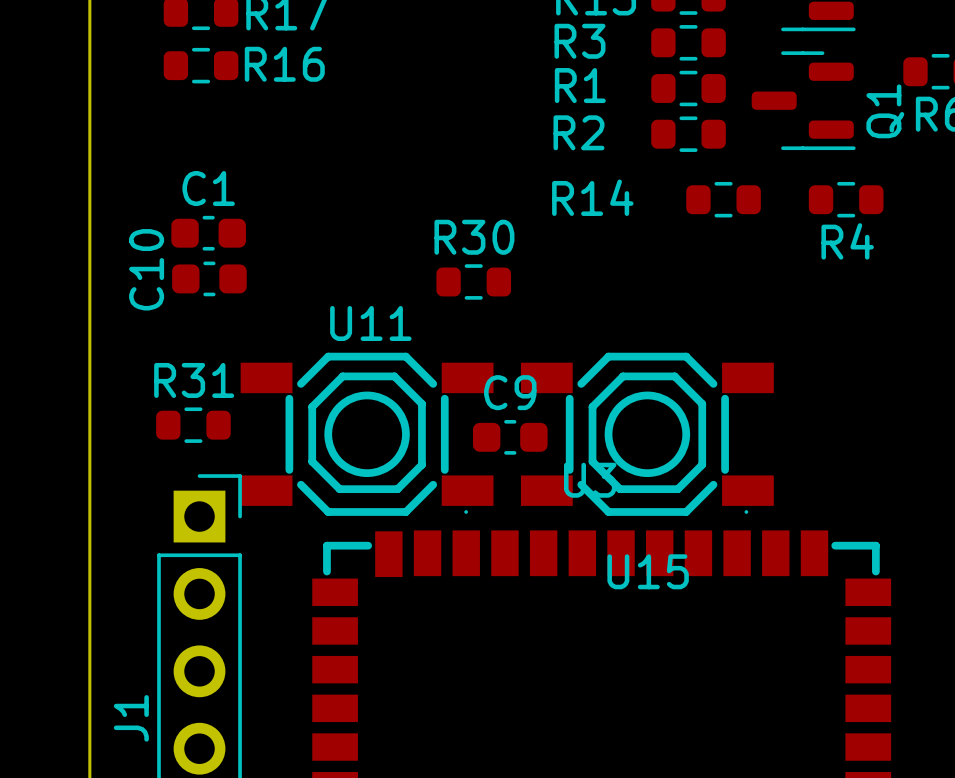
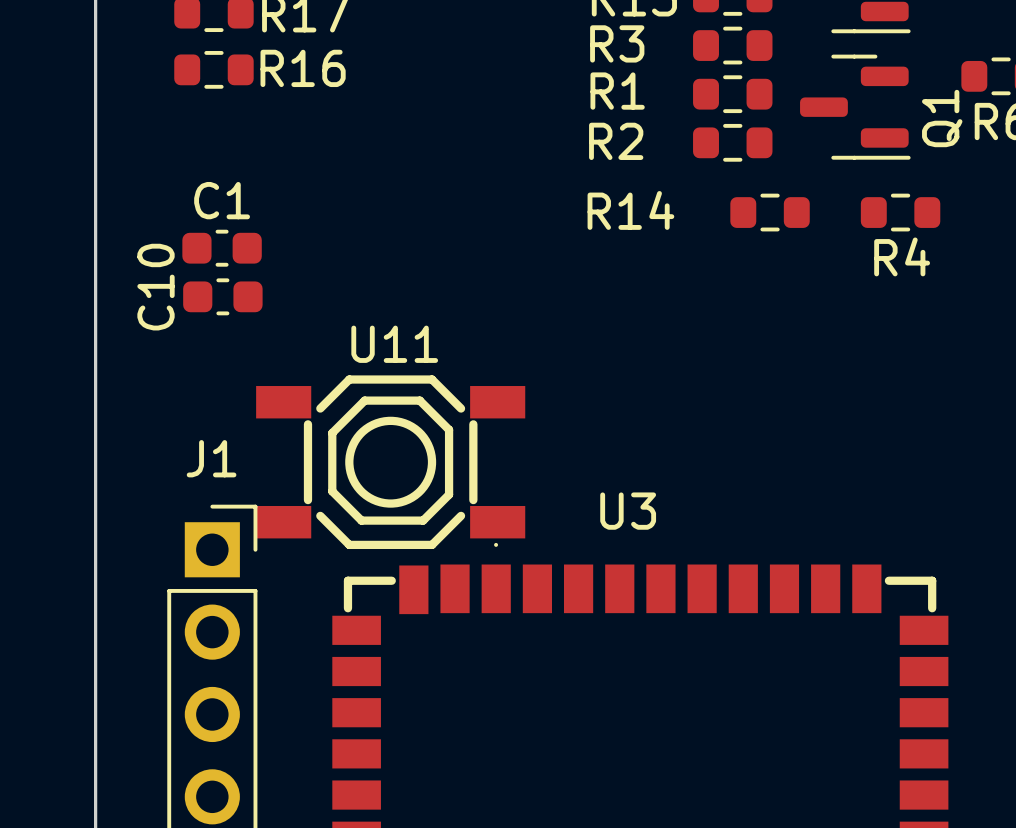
R30: (473, 281) -> none
R31: (193, 425) -> none
U15: (647, 434) -> none
C9: (510, 437) -> none
J1 name rotation: 0° (131, 718) -> 90° clockwise (211, 458)
J1 name position: J1 (131, 718) -> J1 (211, 458)

